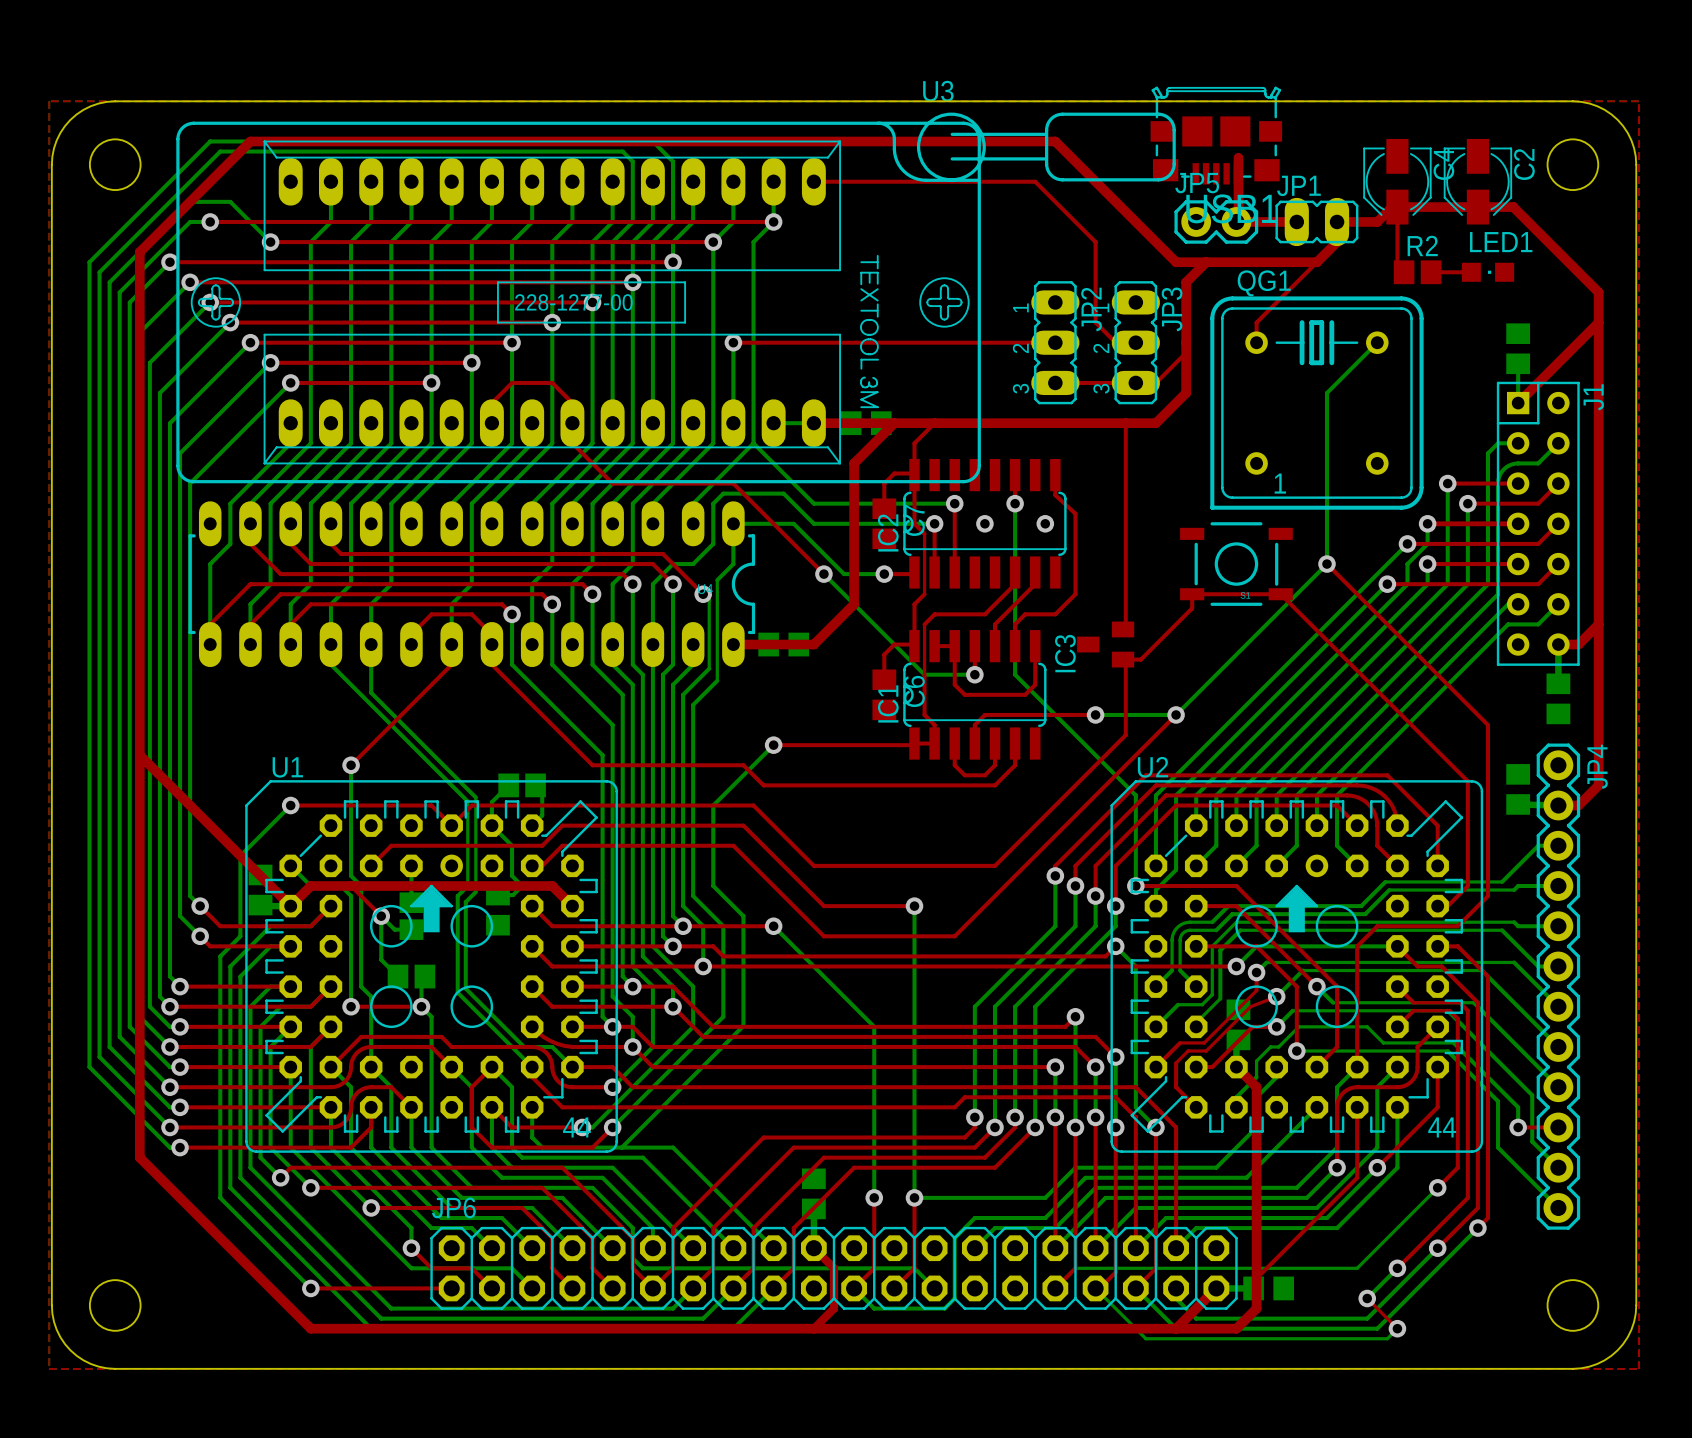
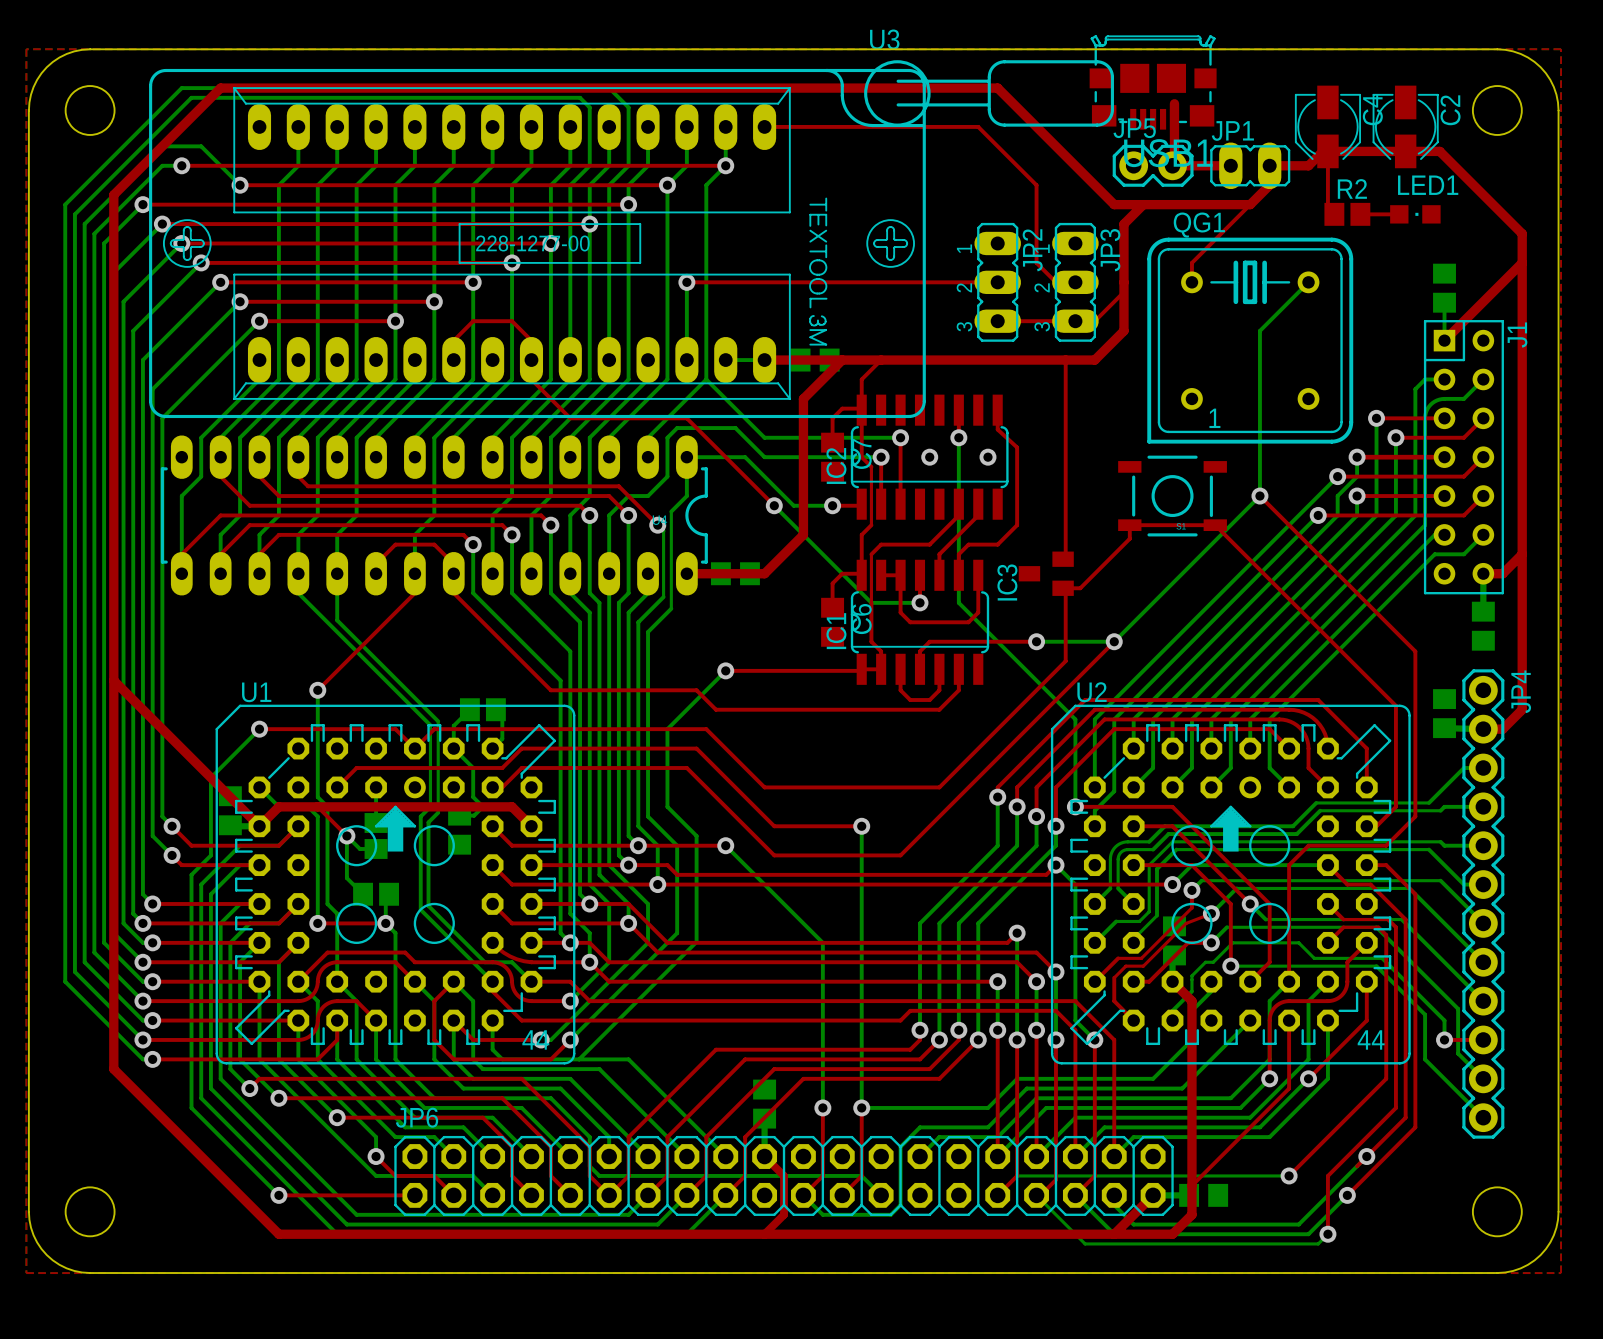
bottom track: (1437, 1187) (1357, 1268) -> none
top track: none -> (1366, 1098) (1289, 1175)
via: (1437, 1187) -> none
bottom track: (1477, 1228) (1417, 1288) -> none
top track: none -> (1405, 1137) (1347, 1195)
via: (1477, 1228) -> none
top track: none -> (1366, 1156) (1357, 1166)
via: none -> (1289, 1175)
bottom track: (1397, 1268) (1367, 1298) -> none
via: (1397, 1268) -> none
via: none -> (1347, 1195)
top track: (1367, 1298) (1397, 1328) -> (1327, 1175) (1327, 1234)
via: (1367, 1298) -> none

